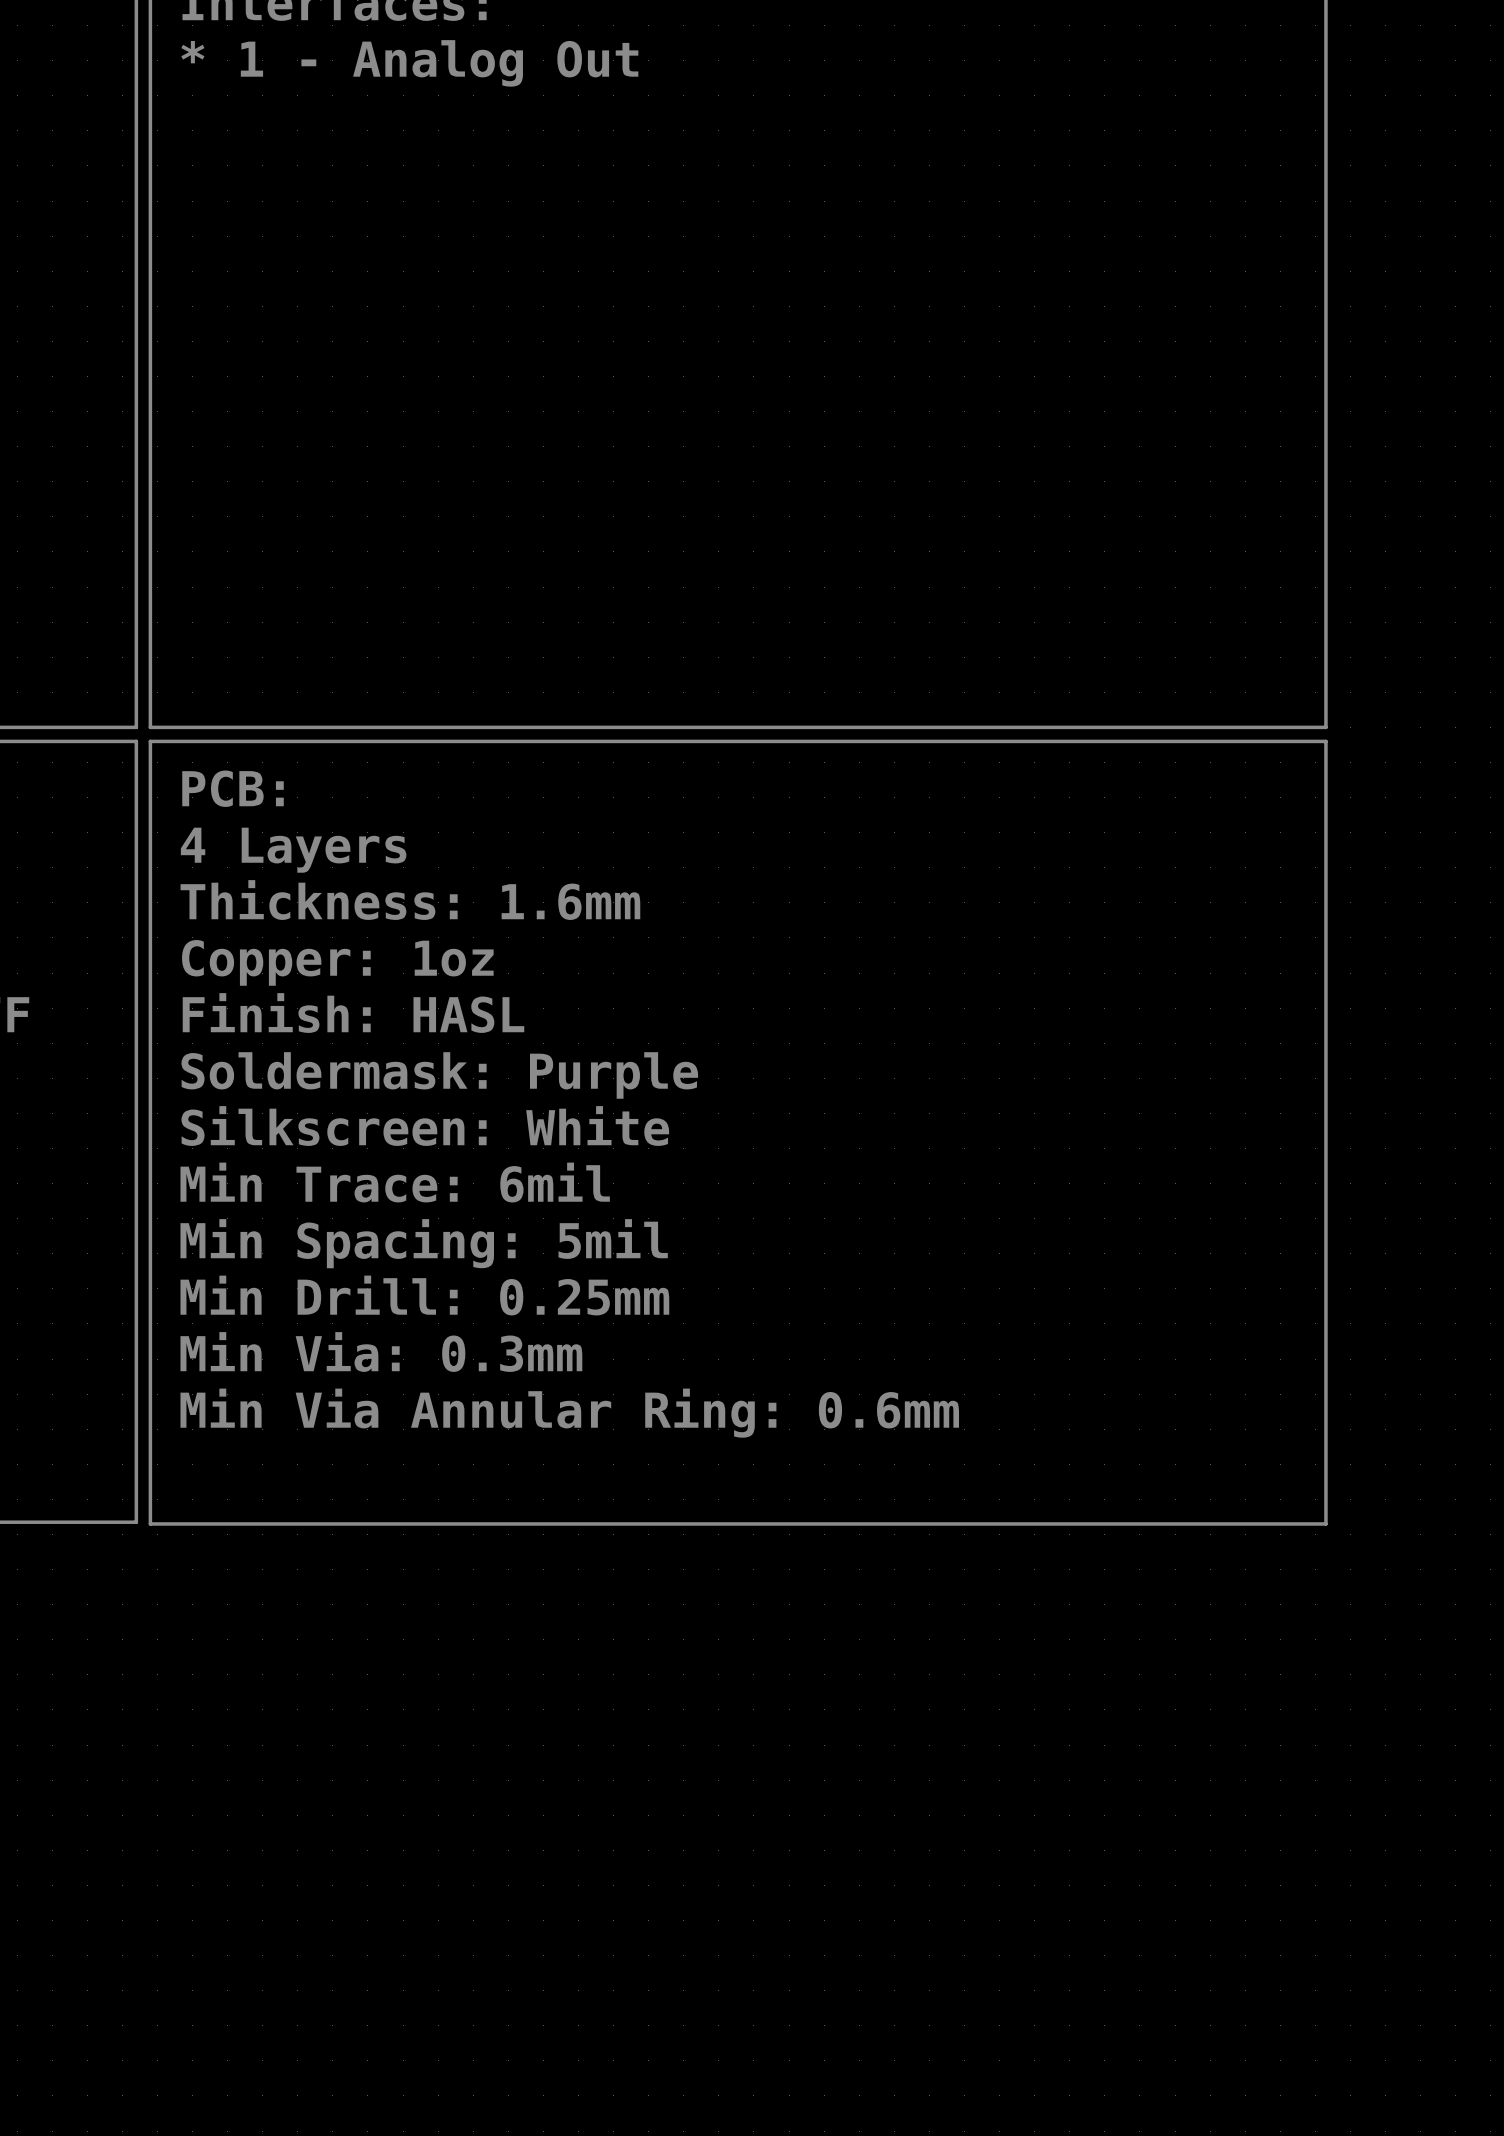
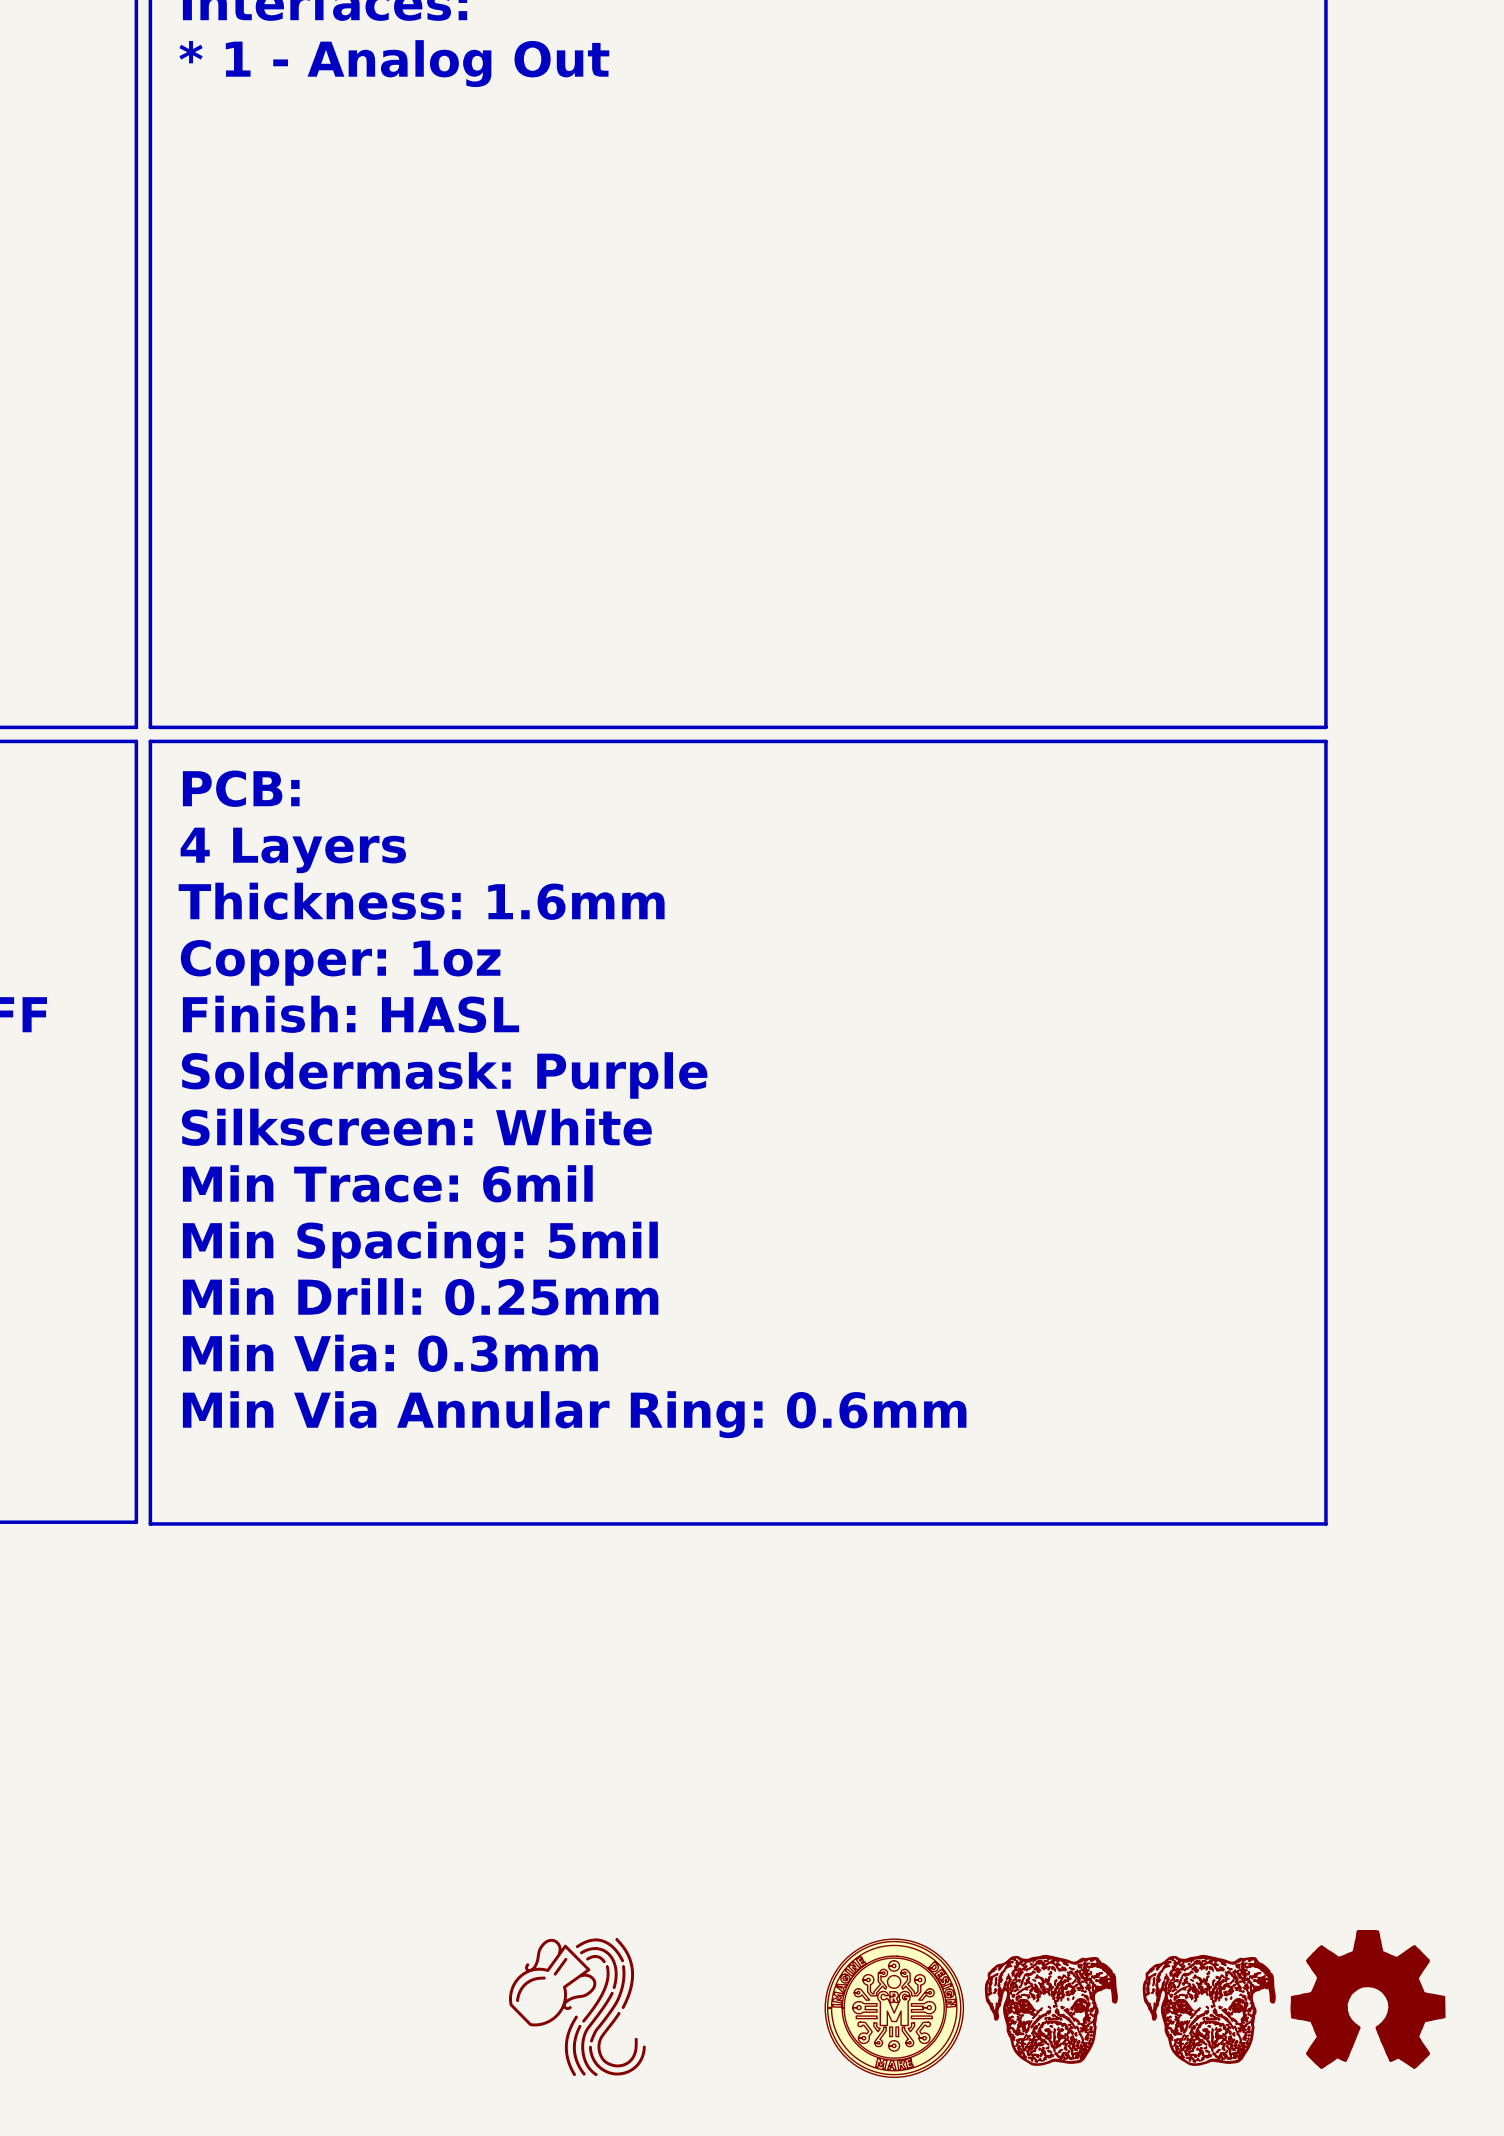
part: none -> (1368, 1999)
part: none -> (577, 2007)
part: none -> (894, 2008)
part: none -> (1051, 2010)
part: none -> (1209, 2010)

